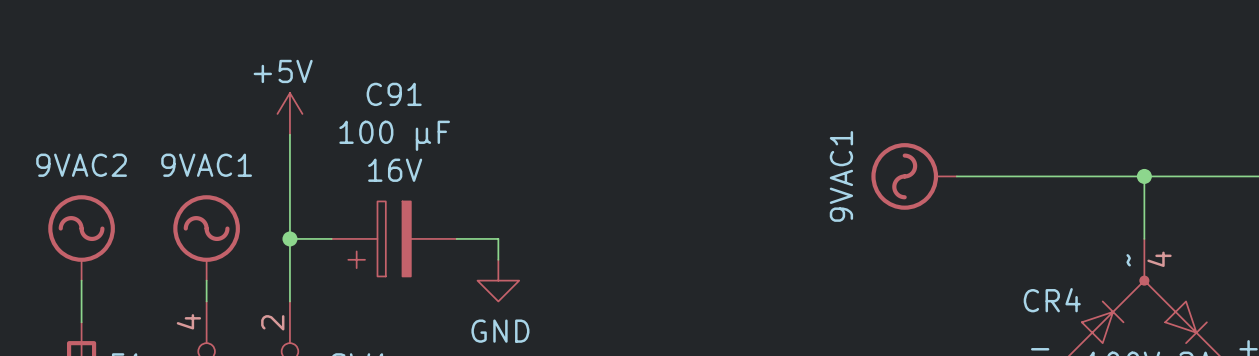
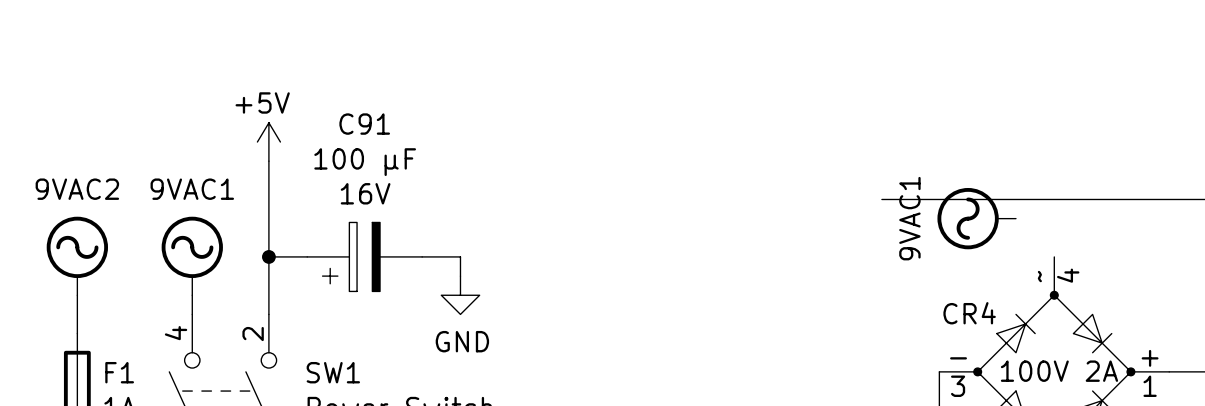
power symbol position: 9VAC1 (914, 176) -> 9VAC1 (976, 218)
wire: (1144, 176) (1144, 238) -> none
junction: (1144, 176) -> none

